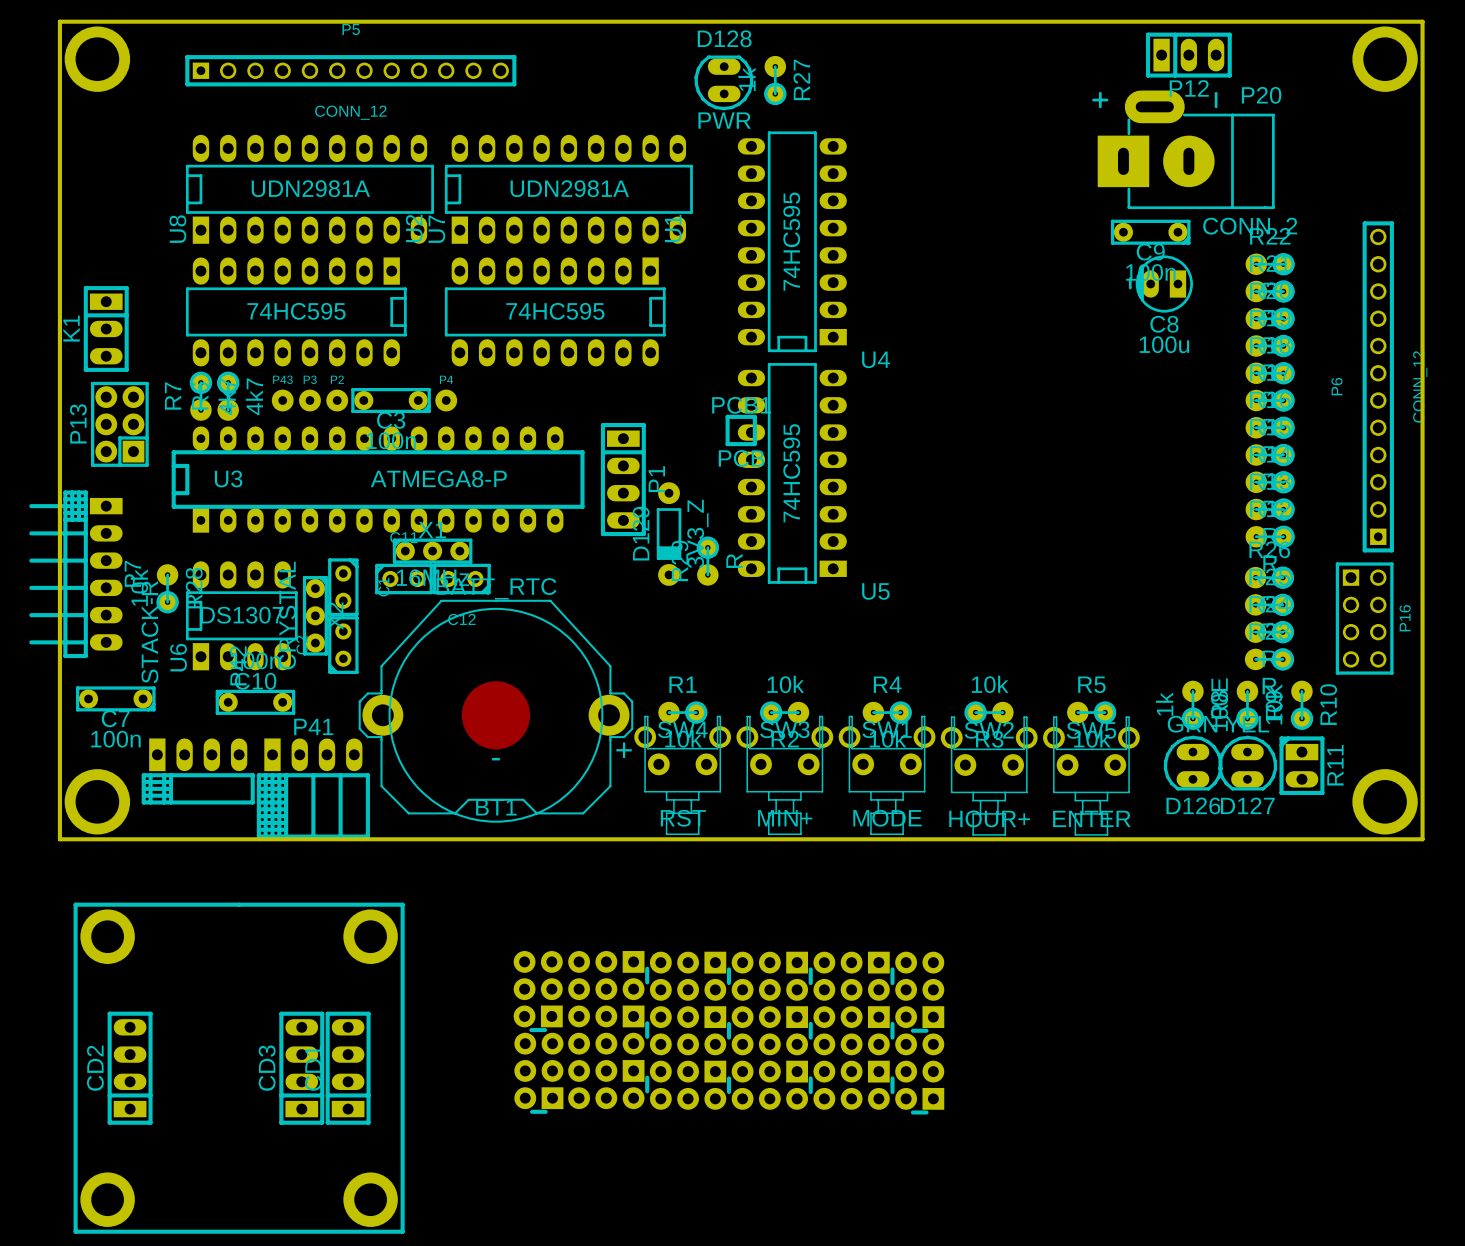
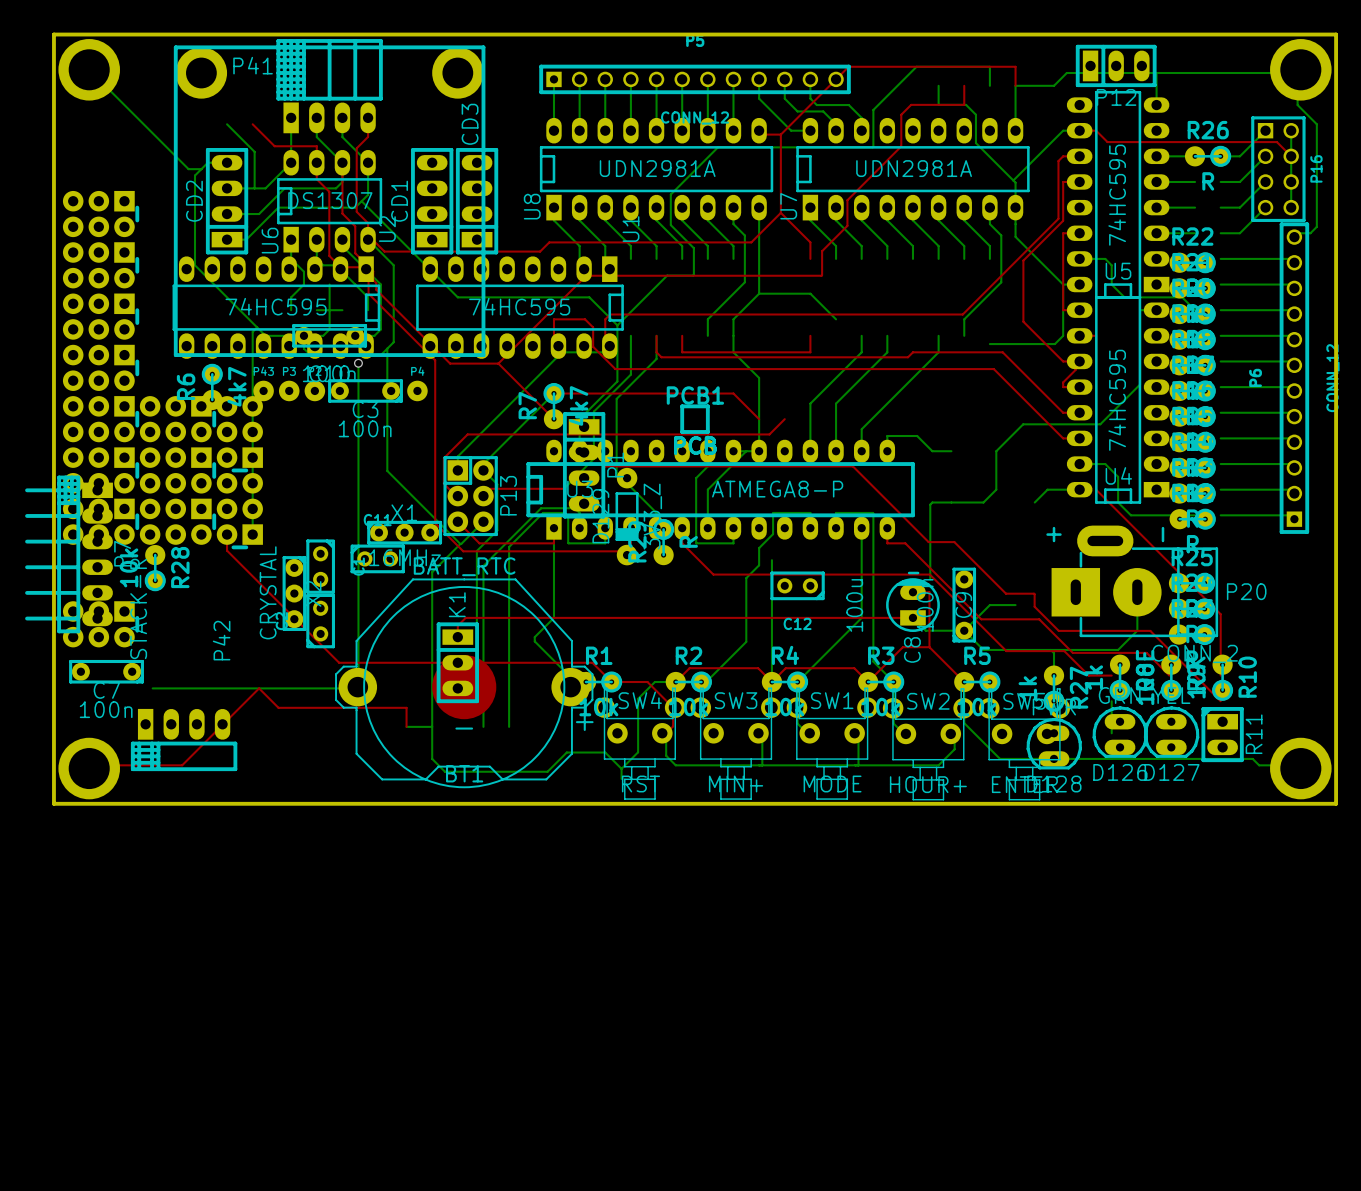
line: none -> (175, 47) (175, 355) (483, 355) (483, 47) (175, 47)
bottom track: none -> (92, 73) (188, 169) (201, 169)
part: none -> (201, 73)
part: none -> (457, 73)
bottom track: none -> (1156, 73) (1156, 105)
bottom track: none -> (553, 79) (553, 130)
bottom track: none -> (579, 79) (579, 130)
bottom track: none -> (605, 79) (605, 130)
bottom track: none -> (630, 79) (630, 130)
bottom track: none -> (656, 79) (656, 130)
bottom track: none -> (682, 79) (682, 130)
bottom track: none -> (707, 79) (707, 130)
bottom track: none -> (733, 79) (733, 130)
bottom track: none -> (759, 79) (759, 98) (791, 130) (810, 130)
bottom track: none -> (784, 79) (784, 98) (797, 111) (823, 111) (836, 124) (836, 130)
bottom track: none -> (810, 79) (810, 98) (816, 105) (848, 105) (861, 117) (861, 130)
P5 position: (350, 70) -> (695, 79)
bottom track: none -> (938, 85) (938, 104) (966, 104) (975, 114) (975, 143) (1015, 182) (1015, 236) (1063, 284) (1079, 284)
top track: none -> (964, 85) (964, 104) (911, 104) (901, 114) (901, 146) (847, 200) (847, 225) (822, 251) (821, 275) (586, 275) (498, 363) (450, 363) (376, 289) (373, 271) (355, 253) (355, 226) (342, 213) (342, 162)
bottom track: none -> (989, 85) (989, 66) (916, 66) (873, 109) (872, 147) (717, 147) (670, 194) (670, 225) (693, 248) (693, 275) (667, 275) (617, 325)
top track: none -> (1015, 85) (1015, 66) (848, 66) (780, 134)
R27 position: (775, 80) -> (1054, 688)
D128 rotation: 0° (723, 82) -> 180° (1054, 743)
D128 position: (723, 82) -> (1054, 743)
P20 name position: P20 (1261, 95) -> P20 (1246, 591)
bottom track: none -> (291, 117) (291, 162) (265, 188) (227, 188)
bottom track: none -> (316, 117) (316, 137) (342, 162) (342, 181) (336, 188) (284, 188) (259, 214) (227, 214)
bottom track: none -> (342, 117) (342, 137) (368, 162) (368, 194) (355, 207) (278, 207) (246, 239) (227, 239)
top track: none -> (368, 117) (368, 136) (356, 148) (356, 211) (368, 223) (368, 239)
bottom track: none -> (227, 124) (254, 151) (254, 188)
top track: none -> (252, 124) (274, 146) (316, 146) (316, 179) (329, 191) (329, 255) (340, 267) (362, 267) (368, 273) (368, 293) (435, 360) (435, 523) (463, 551) (622, 551) (630, 543) (630, 528)
top track: none -> (759, 130) (759, 134) (780, 134)
bottom track: none -> (1015, 130) (1015, 85) (1054, 85) (1066, 73) (1297, 73) (1297, 105) (1316, 124) (1316, 226) (1310, 233) (1291, 233)
bottom track: none -> (1079, 130) (1063, 130) (1013, 180)
top track: none -> (1079, 130) (1096, 130) (1107, 142) (1276, 142) (1291, 156)
bottom track: none -> (1265, 130) (1239, 156) (1220, 156)
bottom track: none -> (1291, 130) (1291, 207)
top track: none -> (780, 134) (780, 212)
P20 position: (1183, 149) -> (1132, 581)
top track: none -> (1079, 156) (1063, 156) (1058, 161) (1058, 218) (962, 314) (610, 314) (605, 319) (605, 335)
bottom track: none -> (1156, 156) (1195, 156)
bottom track: none -> (1265, 156) (1239, 181) (1220, 181)
bottom track: none -> (227, 162) (207, 162) (194, 175) (194, 265) (257, 327)
top track: none -> (1079, 181) (1063, 181) (1063, 220) (1023, 260) (1023, 321) (1063, 361) (1071, 361) (1075, 365)
bottom track: none -> (1156, 181) (1195, 181)
bottom track: none -> (1265, 181) (1239, 207) (1220, 207)
U8 position: (309, 189) -> (656, 169)
U7 position: (568, 189) -> (912, 169)
bottom track: none -> (361, 201) (457, 297) (589, 297) (617, 325)
bottom track: none -> (553, 207) (553, 220) (579, 246) (579, 258)
bottom track: none -> (579, 207) (579, 220) (605, 246) (605, 258)
bottom track: none -> (605, 207) (605, 220) (630, 246) (630, 258)
bottom track: none -> (630, 207) (630, 220) (656, 246) (656, 258)
bottom track: none -> (656, 207) (656, 220) (682, 246) (682, 258)
bottom track: none -> (682, 207) (682, 220) (707, 246) (707, 258)
bottom track: none -> (707, 207) (707, 220) (733, 246) (733, 258)
bottom track: none -> (733, 207) (733, 224) (744, 235) (744, 282) (707, 319) (707, 335)
bottom track: none -> (759, 207) (759, 293)
bottom track: none -> (810, 207) (810, 220) (836, 246) (836, 258)
bottom track: none -> (836, 207) (836, 220) (861, 246) (861, 258)
bottom track: none -> (861, 207) (861, 220) (887, 246) (887, 258)
bottom track: none -> (887, 207) (887, 220) (912, 246) (912, 258)
bottom track: none -> (912, 207) (912, 220) (938, 246) (938, 258)
bottom track: none -> (938, 207) (938, 220) (964, 246) (964, 258)
bottom track: none -> (964, 207) (964, 220) (989, 246) (989, 258)
bottom track: none -> (989, 207) (989, 224) (1001, 235) (1001, 282) (964, 319) (964, 335)
bottom track: none -> (1156, 207) (1195, 207)
bottom track: none -> (1265, 207) (1239, 233) (1220, 233)
top track: none -> (780, 212) (751, 242) (549, 242) (540, 251) (384, 251) (368, 235)
top track: none -> (780, 212) (810, 242) (810, 258)
part: none -> (101, 214)
top track: none -> (1079, 233) (1063, 233) (1063, 310) (1079, 310)
C9 rotation: 0° (1150, 232) -> 90° clockwise (964, 605)
C9 position: (1150, 232) -> (964, 605)
bottom track: none -> (1156, 233) (1195, 233)
bottom track: none -> (291, 239) (291, 258) (303, 271) (303, 284) (291, 297) (291, 310)
bottom track: none -> (316, 239) (316, 258) (323, 265) (336, 265) (368, 297) (368, 310)
bottom track: none -> (342, 239) (342, 246) (380, 284) (380, 329) (374, 335) (355, 335)
bottom track: none -> (368, 239) (393, 265) (393, 342) (380, 355) (310, 355) (303, 348) (303, 335)
U4 position: (792, 241) -> (1118, 399)
bottom track: none -> (1079, 258) (1105, 258) (1111, 265) (1111, 284) (1124, 297) (1182, 297) (1195, 310)
bottom track: none -> (1220, 258) (1291, 258)
part: none -> (101, 265)
C8 rotation: 0° (1160, 284) -> 90° clockwise (912, 601)
C8 position: (1160, 284) -> (912, 601)
bottom track: none -> (329, 284) (329, 329) (323, 335) (265, 335) (257, 327)
bottom track: none -> (1063, 284) (1063, 335) (1054, 344) (989, 344)
bottom track: none -> (1220, 284) (1291, 284)
bottom track: none -> (759, 293) (733, 319) (733, 352) (759, 377) (759, 451) (733, 451)
bottom track: none -> (759, 293) (810, 293) (836, 319)
bottom track: none -> (316, 310) (342, 310)
bottom track: none -> (1156, 310) (1140, 310) (1140, 384) (1100, 424) (1023, 424) (996, 451) (996, 489) (983, 502) (932, 502) (930, 504) (930, 579)
bottom track: none -> (1220, 310) (1291, 310)
part: none -> (101, 316)
K1 name position: K1 (71, 328) -> K1 (457, 604)
K1 position: (106, 328) -> (457, 662)
bottom track: none -> (617, 325) (617, 381) (579, 419) (579, 451)
bottom track: none -> (257, 327) (252, 331) (252, 534)
top track: none -> (553, 335) (553, 319) (585, 319) (593, 327) (593, 346) (615, 369) (993, 369) (1063, 438) (1079, 438)
bottom track: none -> (605, 335) (605, 352) (562, 352) (457, 456) (457, 470)
bottom track: none -> (630, 335) (630, 374) (593, 411) (593, 458) (563, 488)
bottom track: none -> (656, 335) (656, 358) (616, 398) (616, 473) (656, 512) (656, 528)
top track: none -> (656, 335) (656, 352) (661, 357) (908, 357) (912, 352) (1002, 352) (1063, 412) (1079, 412)
top track: none -> (682, 335) (682, 352) (810, 352) (810, 335)
bottom track: none -> (861, 335) (861, 352) (810, 403) (810, 451)
bottom track: none -> (887, 335) (887, 352) (836, 403) (836, 451)
bottom track: none -> (938, 335) (938, 352) (861, 429) (861, 451)
top track: none -> (1079, 335) (1096, 335) (1096, 489) (1220, 614) (1220, 675)
bottom track: none -> (1220, 335) (1291, 335)
bottom track: none -> (387, 348) (387, 470) (460, 543)
U4 name position: U4 (876, 359) -> U4 (1118, 475)
bottom track: none -> (1220, 361) (1291, 361)
bottom track: none -> (358, 363) (358, 681)
via: none -> (358, 363)
top track: none -> (498, 363) (553, 419)
top track: none -> (1075, 365) (1075, 370) (1063, 382) (1063, 387) (1079, 387)
part: none -> (101, 367)
R7 position: (200, 396) -> (553, 406)
bottom track: none -> (1220, 387) (1291, 387)
bottom track: none -> (553, 393) (483, 464) (483, 470) (497, 484) (497, 530) (476, 550) (476, 662) (457, 662)
top track: none -> (553, 393) (733, 393) (759, 419)
drawing: none -> [680, 405, 710, 434]
bottom track: none -> (1220, 412) (1291, 412)
P13 rotation: 0° (119, 424) -> 180° (470, 496)
P13 position: (119, 424) -> (470, 496)
part: none -> (101, 419)
part: none -> (178, 419)
bottom track: none -> (707, 419) (707, 466) (696, 478) (696, 542) (733, 543) (733, 528)
top track: none -> (784, 419) (769, 434) (467, 434) (443, 458) (443, 483) (457, 496)
part: none -> (239, 434)
bottom track: none -> (1220, 438) (1291, 438)
top track: none -> (605, 451) (605, 466) (852, 466) (928, 542) (954, 542) (1006, 593) (1034, 593) (1034, 606) (1058, 630) (1150, 630) (1220, 701)
bottom track: none -> (746, 451) (707, 489) (707, 528)
bottom track: none -> (887, 451) (887, 436) (917, 436) (932, 451) (951, 451)
U5 position: (792, 473) -> (1118, 194)
bottom track: none -> (1079, 464) (1105, 464) (1118, 476) (1118, 502) (1130, 515) (1195, 515)
bottom track: none -> (1220, 464) (1291, 464)
U3 position: (378, 479) -> (720, 489)
part: none -> (101, 470)
part: none -> (178, 470)
top track: none -> (563, 488) (490, 488) (483, 496)
bottom track: none -> (1079, 489) (1047, 489) (1034, 502)
bottom track: none -> (1220, 489) (1291, 489)
part: none -> (239, 511)
bottom track: none -> (1220, 515) (1291, 515)
part: none -> (101, 521)
part: none -> (178, 521)
top track: none -> (457, 521) (479, 543) (553, 543) (553, 528)
bottom track: none -> (483, 521) (460, 543)
bottom track: none -> (553, 528) (553, 617) (534, 637) (534, 641) (586, 692)
bottom track: none -> (579, 528) (579, 512) (574, 508) (541, 508) (483, 565) (483, 726)
bottom track: none -> (605, 528) (605, 543) (568, 543) (568, 517) (563, 512) (543, 512) (509, 546) (509, 726)
top track: none -> (682, 528) (682, 543) (713, 574) (929, 574) (1006, 651) (1064, 651) (1088, 675) (1111, 675)
bottom track: none -> (810, 528) (810, 512) (773, 513) (773, 534) (759, 548) (759, 565) (746, 578) (746, 641) (701, 686)
bottom track: none -> (836, 528) (836, 512) (873, 513) (873, 661) (893, 682) (893, 723) (903, 733)
bottom track: none -> (861, 528) (861, 617) (797, 682) (797, 723) (807, 733)
top track: none -> (887, 528) (887, 543) (905, 543) (981, 619) (1039, 619) (1072, 652) (1146, 652) (1169, 675)
top track: none -> (227, 534) (227, 550) (339, 662) (592, 662) (611, 682) (647, 682) (673, 707) (673, 726) (666, 733)
bottom track: none -> (460, 543) (432, 572) (432, 758) (445, 771) (547, 771) (566, 752) (605, 752) (621, 768)
R26 position: (1269, 577) -> (1208, 156)
C12 position: (461, 579) -> (797, 585)
bottom track: none -> (771, 560) (771, 682)
U5 name position: U5 (875, 591) -> U5 (1118, 271)
top track: none -> (912, 592) (929, 592) (929, 647)
bottom track: none -> (1137, 592) (1137, 630) (1118, 649) (983, 649) (964, 630)
U6 position: (241, 615) -> (329, 201)
P16 position: (1364, 618) -> (1278, 169)
bottom track: none -> (1015, 605) (989, 605) (964, 630)
bottom track: none -> (912, 617) (925, 630) (964, 630)
top track: none -> (912, 617) (465, 617) (457, 625) (457, 637)
part: none -> (101, 624)
top track: none -> (929, 647) (902, 647) (868, 682) (854, 668) (785, 668) (771, 682) (758, 668) (689, 668) (675, 682)
top track: none -> (929, 647) (964, 682)
bottom track: none -> (1050, 649) (1054, 653) (1054, 675)
C10 rotation: 0° (255, 702) -> 180° (329, 335)
C10 position: (255, 702) -> (329, 335)
bottom track: none -> (358, 681) (351, 688) (152, 688)
bottom track: none -> (675, 682) (654, 682) (638, 698) (638, 752) (621, 768)
bottom track: none -> (964, 682) (964, 723) (1000, 758) (1252, 758) (1259, 765) (1297, 765)
R1 position: (682, 712) -> (599, 682)
R2 rotation: 0° (784, 712) -> 180° (688, 682)
R2 position: (784, 712) -> (688, 682)
R4 position: (887, 712) -> (784, 682)
R3 rotation: 0° (989, 712) -> 180° (881, 682)
R3 position: (989, 712) -> (881, 682)
R5 position: (1091, 712) -> (977, 682)
P41 name position: P41 (313, 726) -> P41 (253, 65)
bottom track: none -> (1111, 701) (1111, 733)
P41 footprint: [256, 738, 370, 839] -> [276, 39, 383, 134]
bottom track: none -> (406, 726) (432, 726)
top track: none -> (406, 726) (406, 707) (278, 707) (259, 688) (182, 765) (92, 765)
bottom track: none -> (666, 733) (666, 755) (675, 765) (938, 765) (954, 749) (954, 733)
bottom track: none -> (762, 733) (762, 765)
bottom track: none -> (858, 733) (858, 765)
bottom track: none -> (621, 768) (621, 778)
line: (75, 904) (402, 904) (402, 1231) (75, 1231) (75, 904) -> none
part: (107, 936) -> none
part: (370, 936) -> none
part: (608, 975) -> none
part: (690, 976) -> none
part: (772, 976) -> none
part: (854, 976) -> none
part: (538, 991) -> none
part: (919, 992) -> none
part: (608, 1030) -> none
part: (690, 1030) -> none
part: (772, 1030) -> none
part: (854, 1030) -> none
CD2 position: (130, 1068) -> (227, 201)
CD3 name position: CD3 (267, 1068) -> CD3 (470, 124)
CD3 position: (301, 1068) -> (477, 201)
CD1 position: (348, 1068) -> (432, 201)
part: (538, 1073) -> none
part: (919, 1074) -> none
part: (608, 1084) -> none
part: (690, 1085) -> none
part: (772, 1085) -> none
part: (854, 1085) -> none
part: (107, 1199) -> none
part: (370, 1199) -> none

